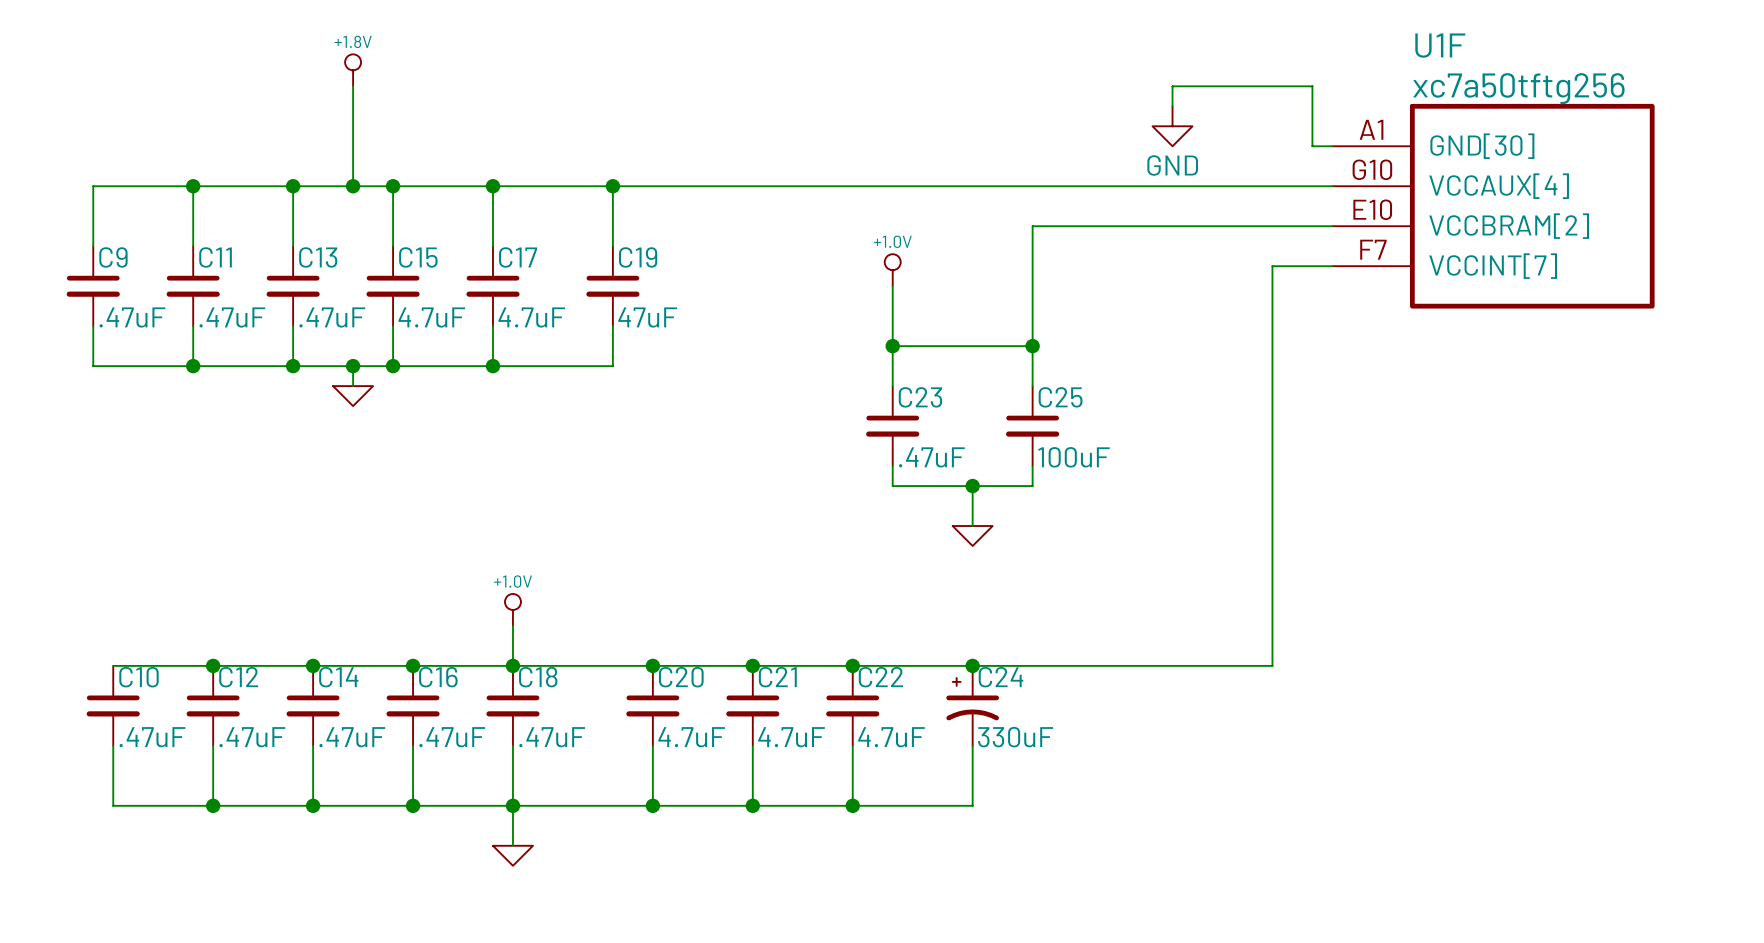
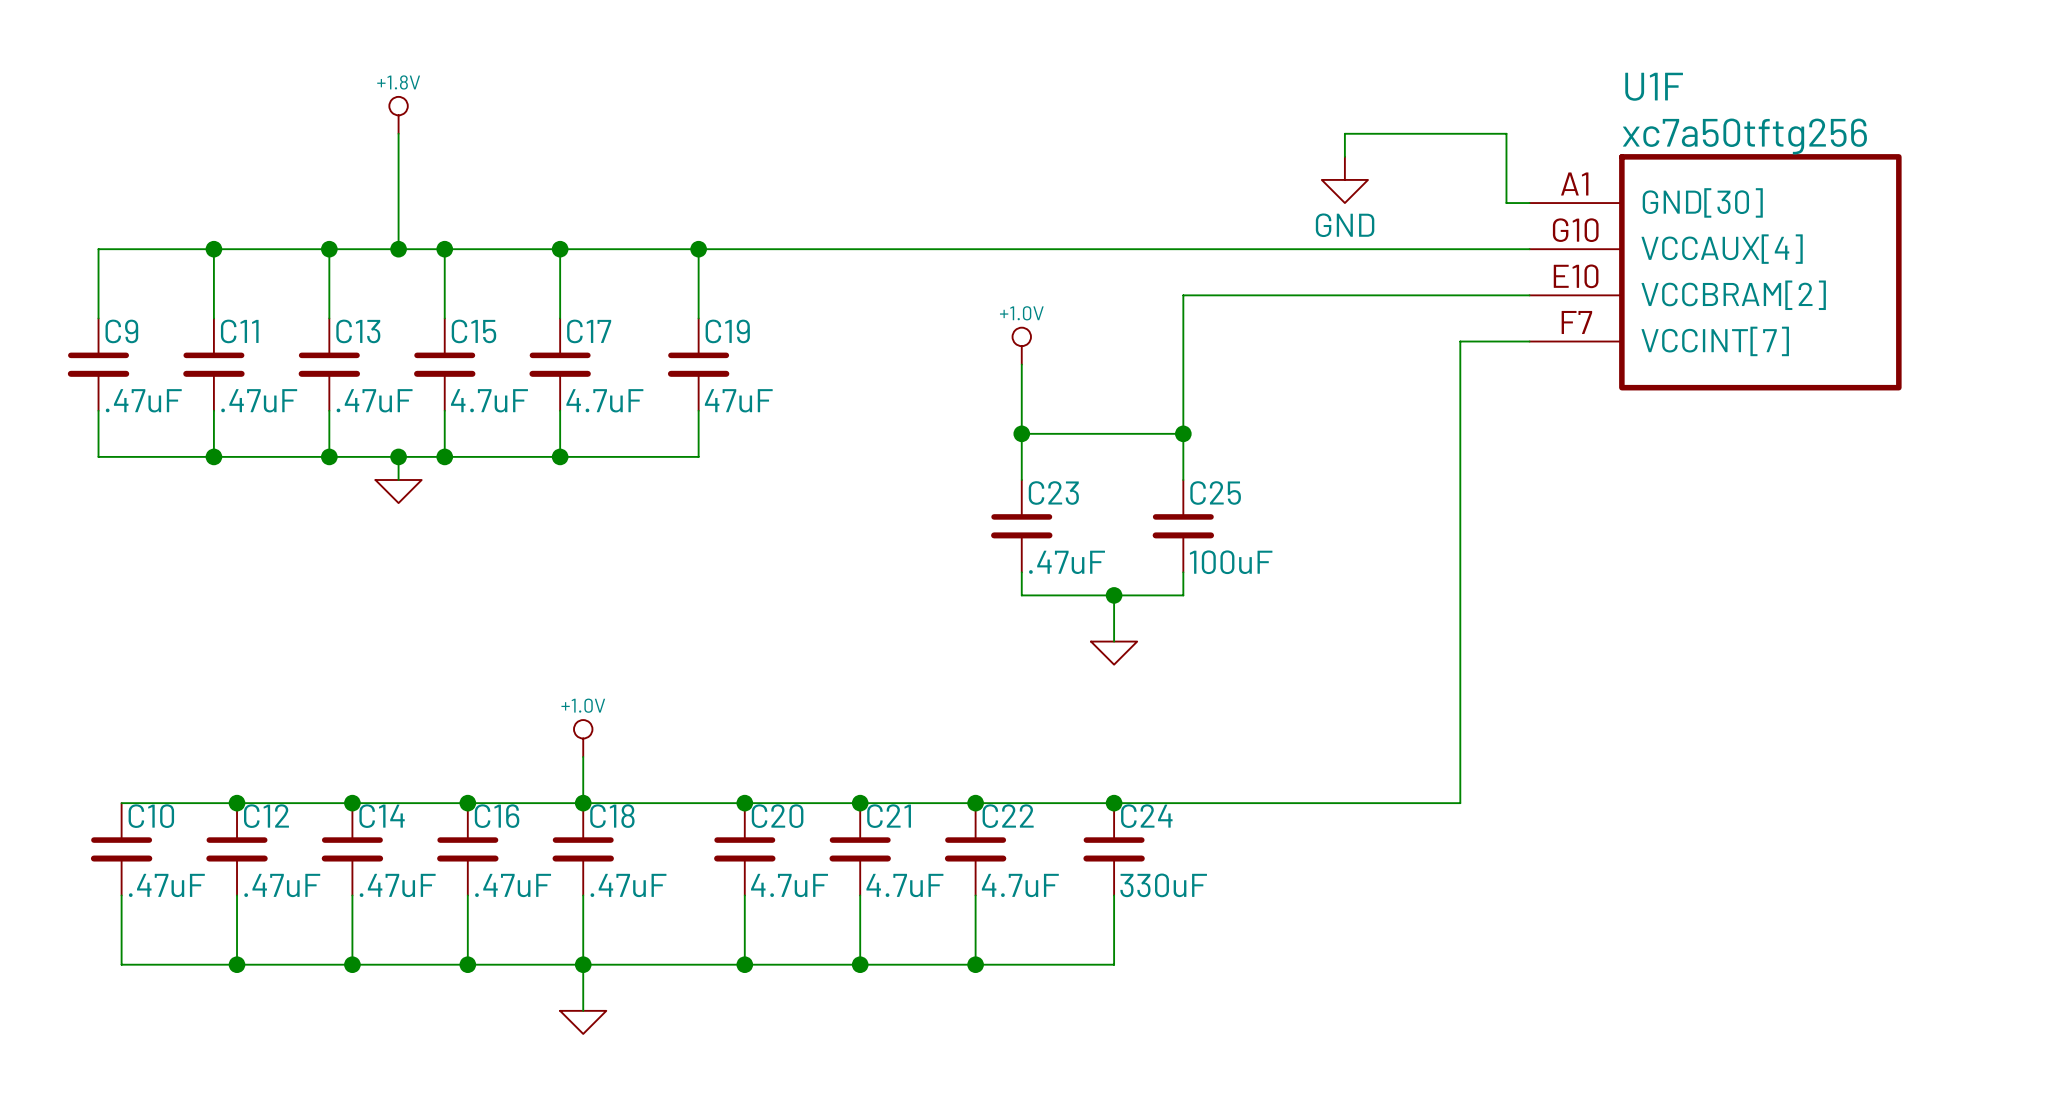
C24 symbol: [946, 665, 1000, 746] -> [1083, 803, 1145, 896]

